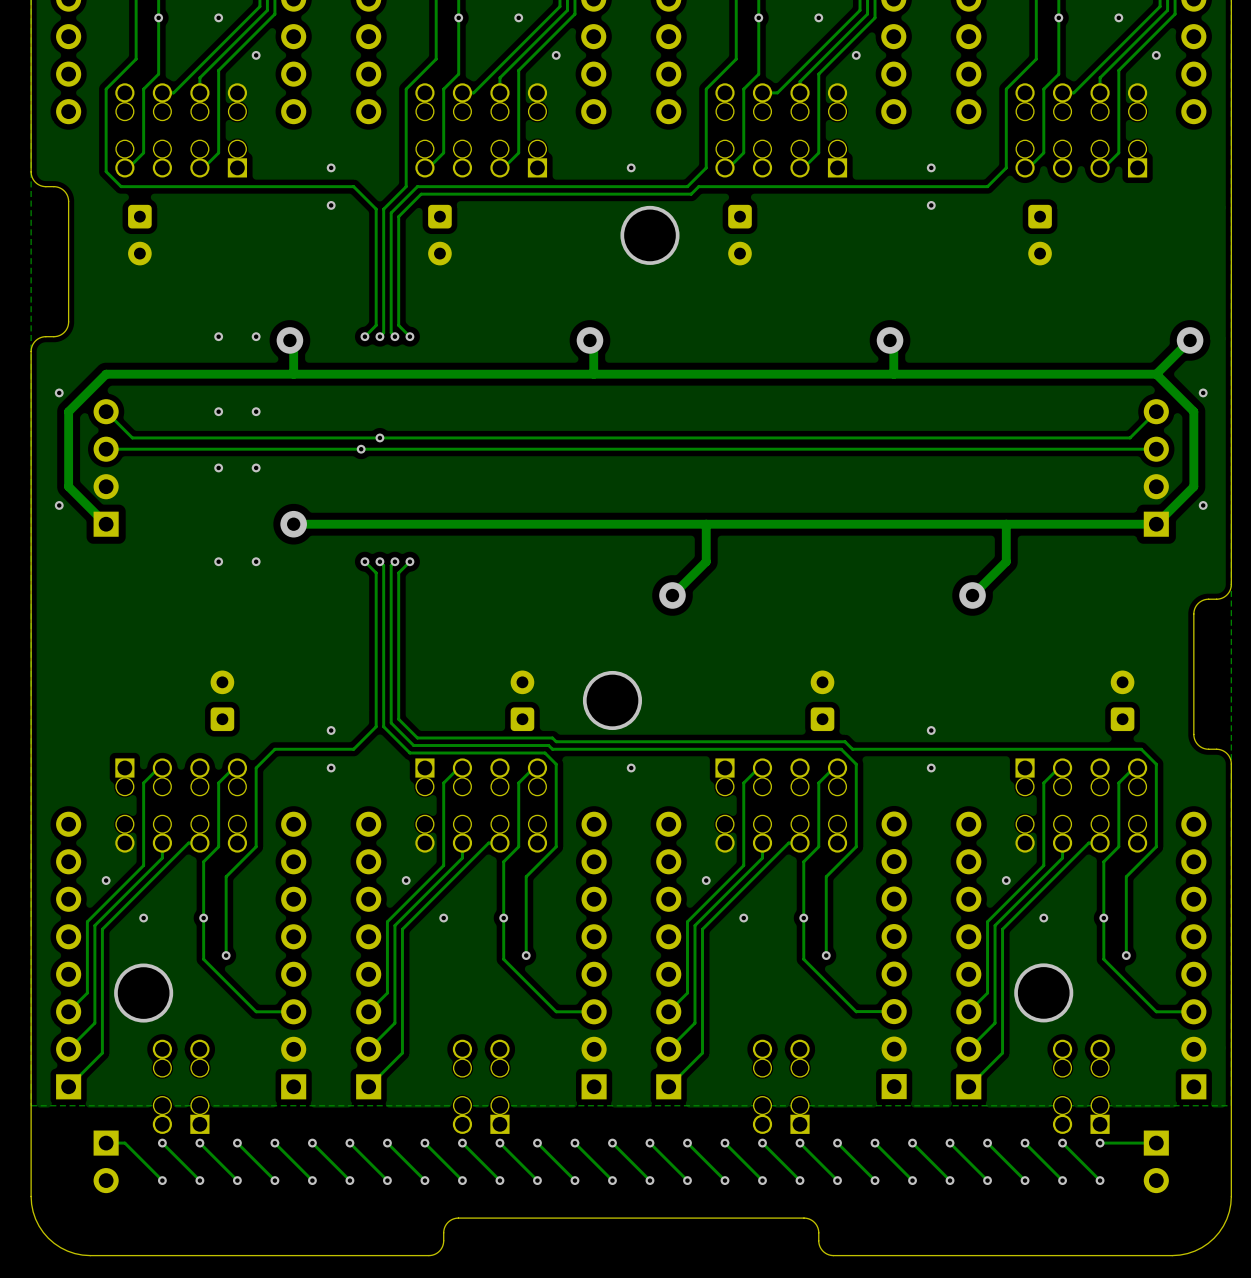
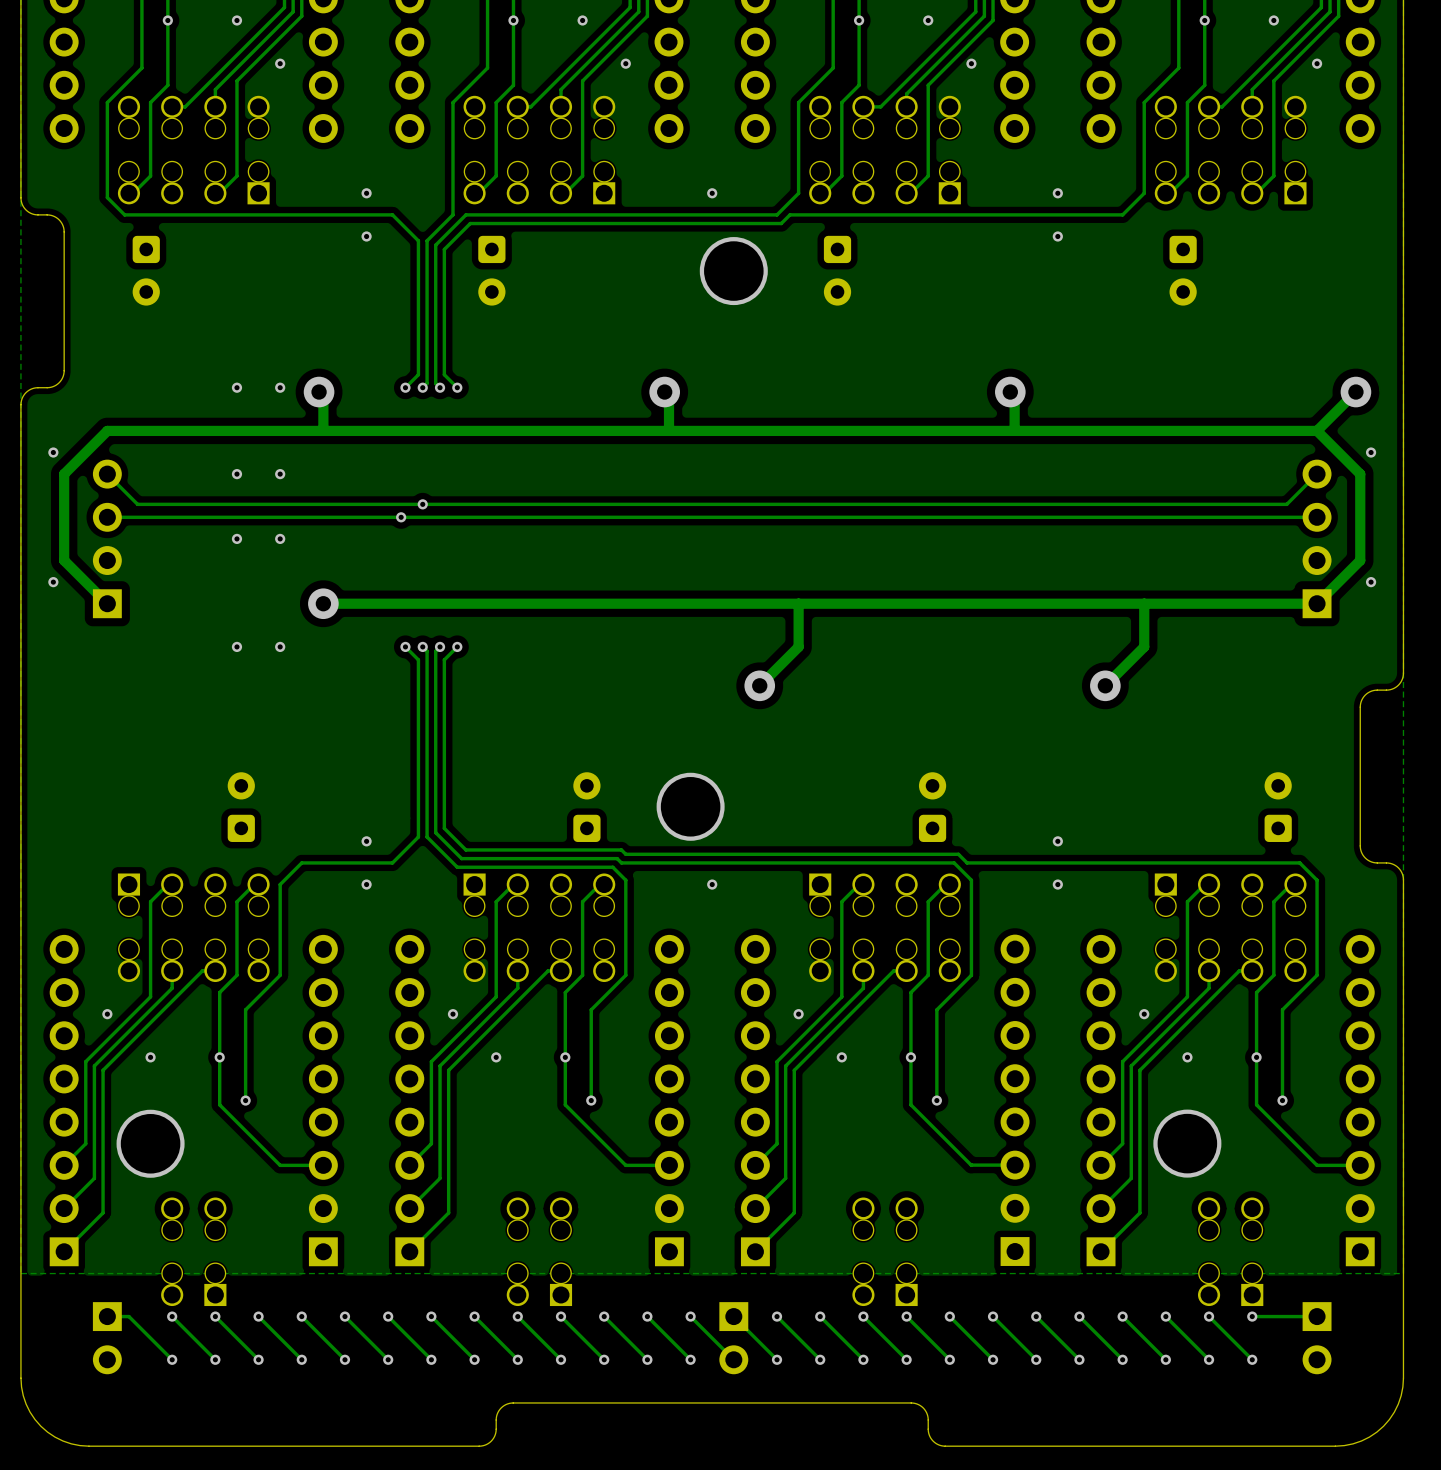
via: (649, 1143) -> none
part: none -> (733, 1338)
via: (649, 1180) -> none

